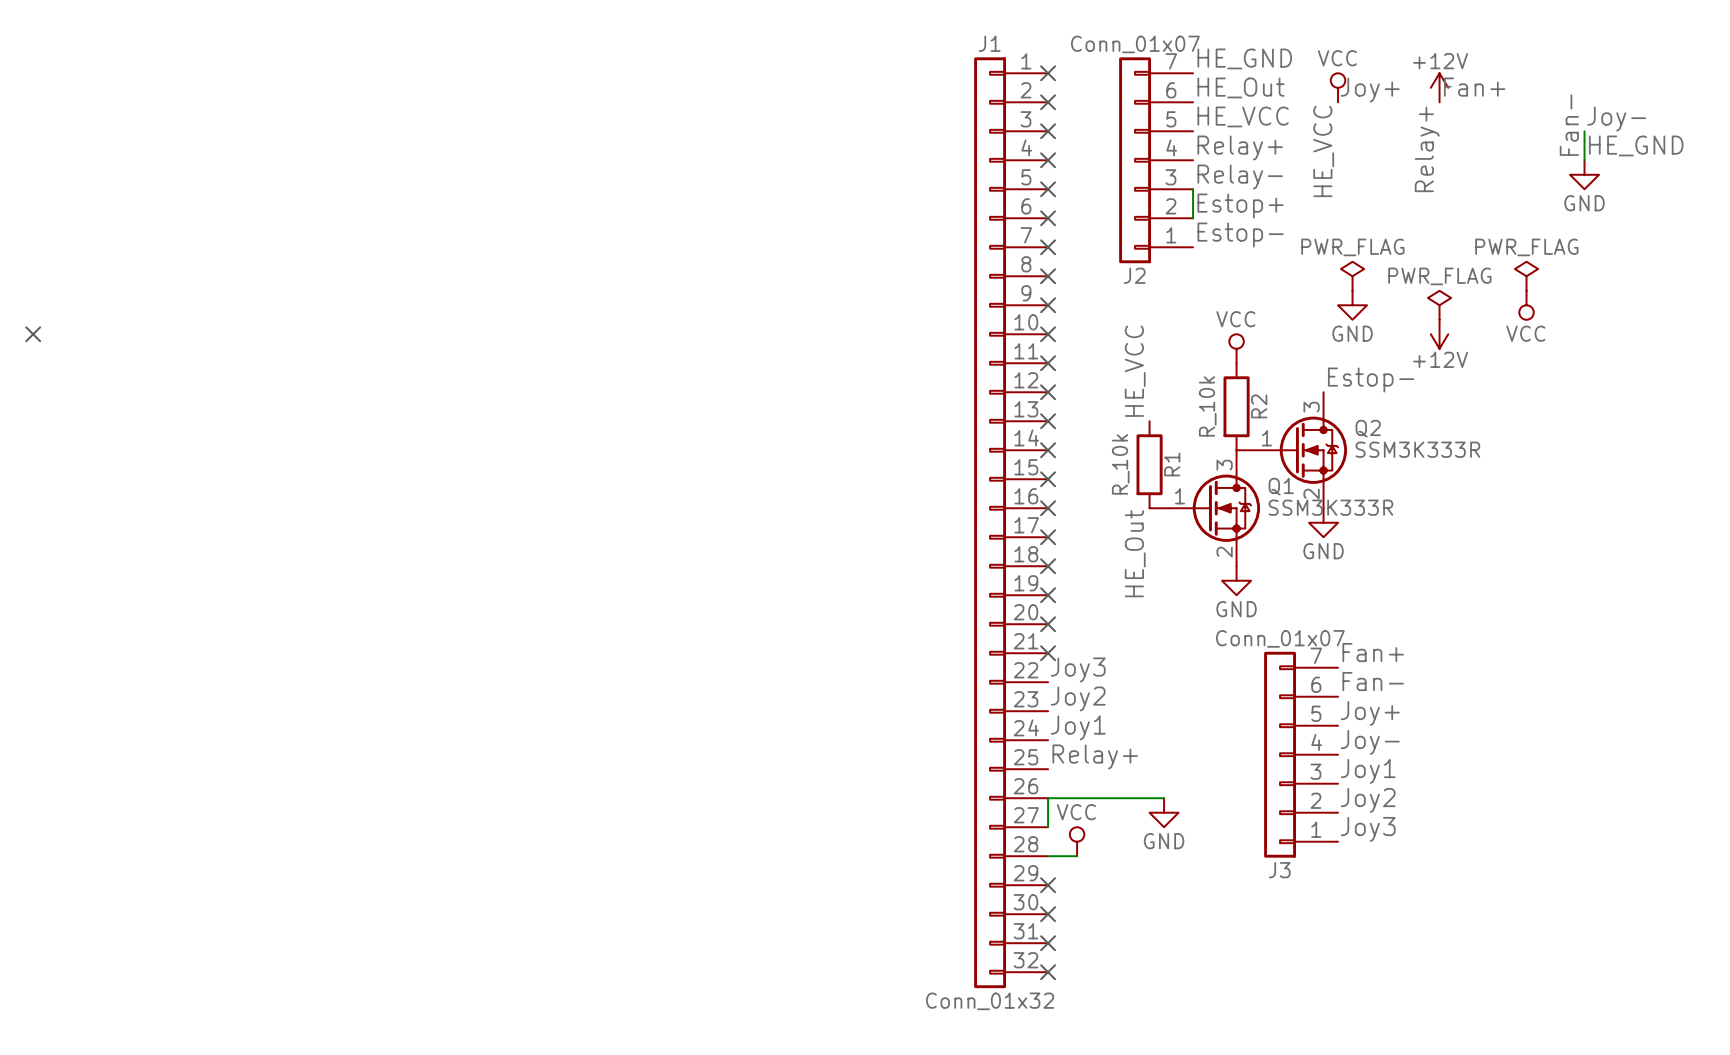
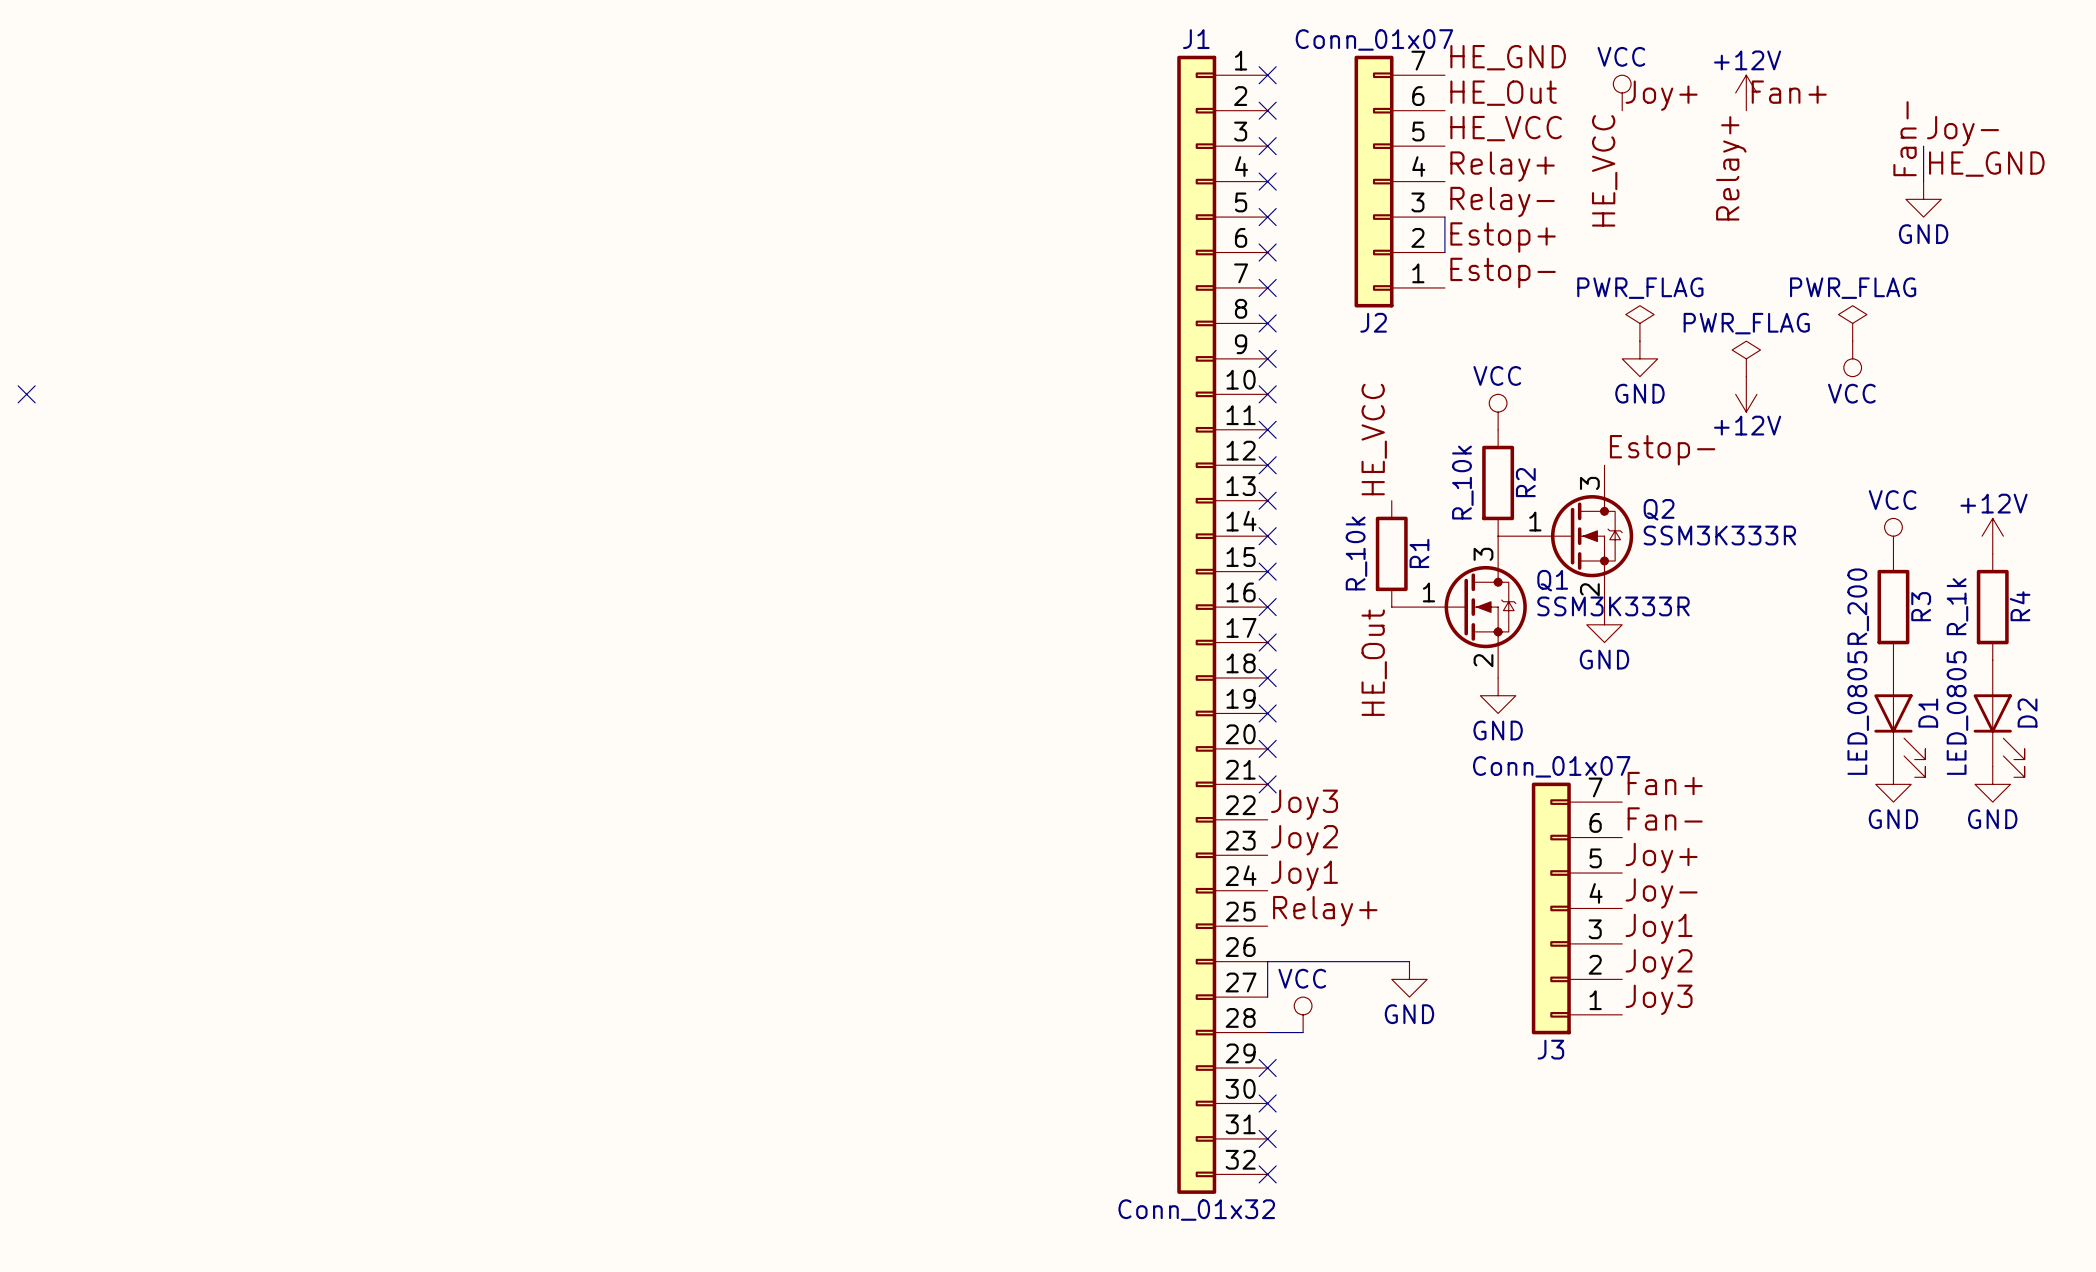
power symbol: none -> VCC (1893, 536)
power symbol: none -> +12V (1992, 536)
R3: none -> R_200 (1893, 607)
R4: none -> R_1k (1992, 607)
D1: none -> LED_0805 (1899, 718)
D2: none -> LED_0805 (1999, 718)
power symbol: none -> GND (1893, 784)
power symbol: none -> GND (1992, 784)

